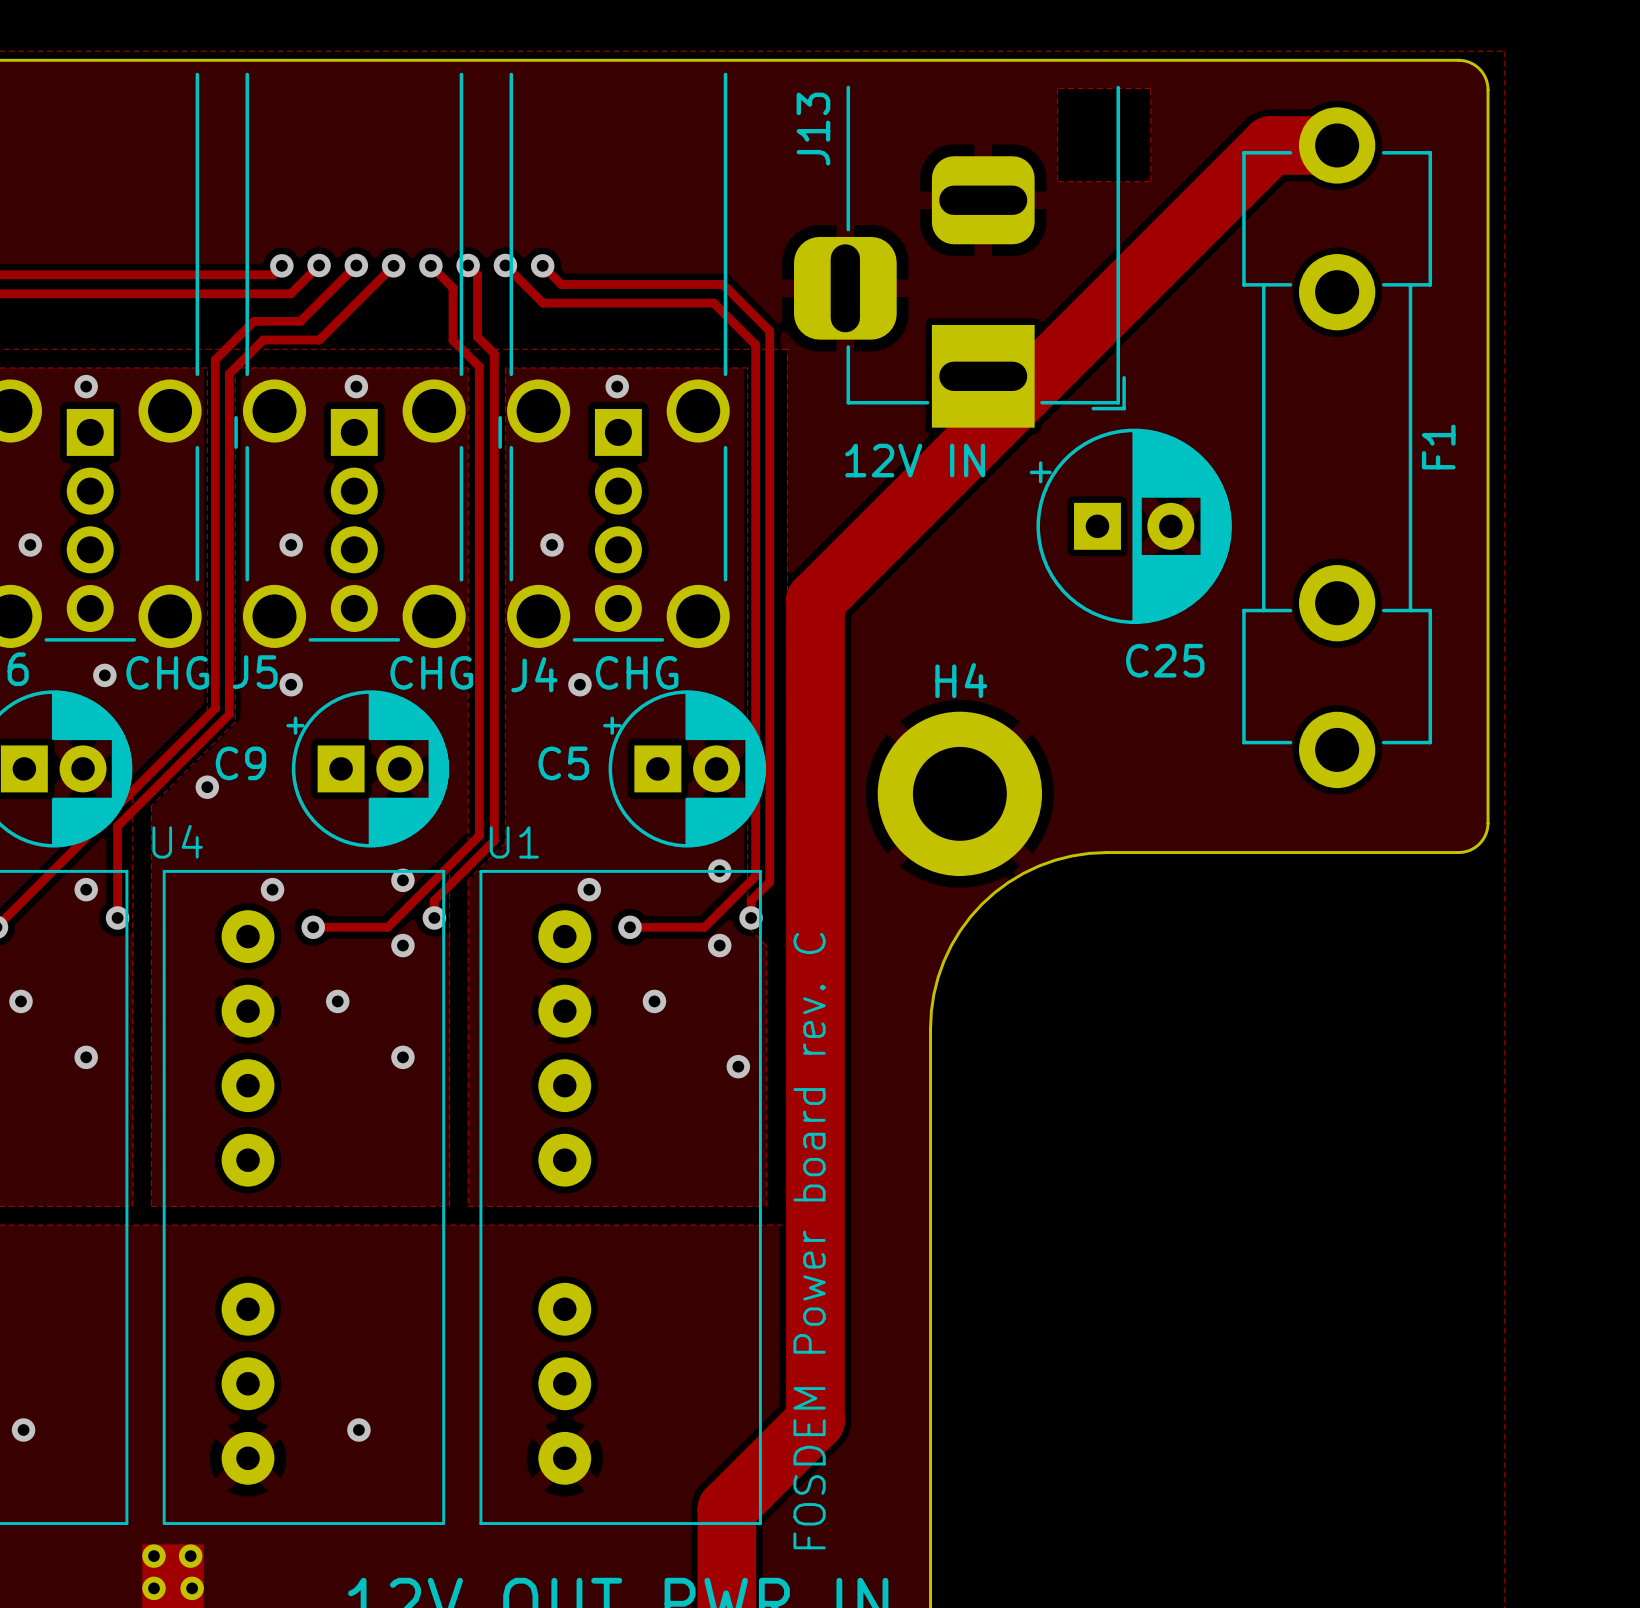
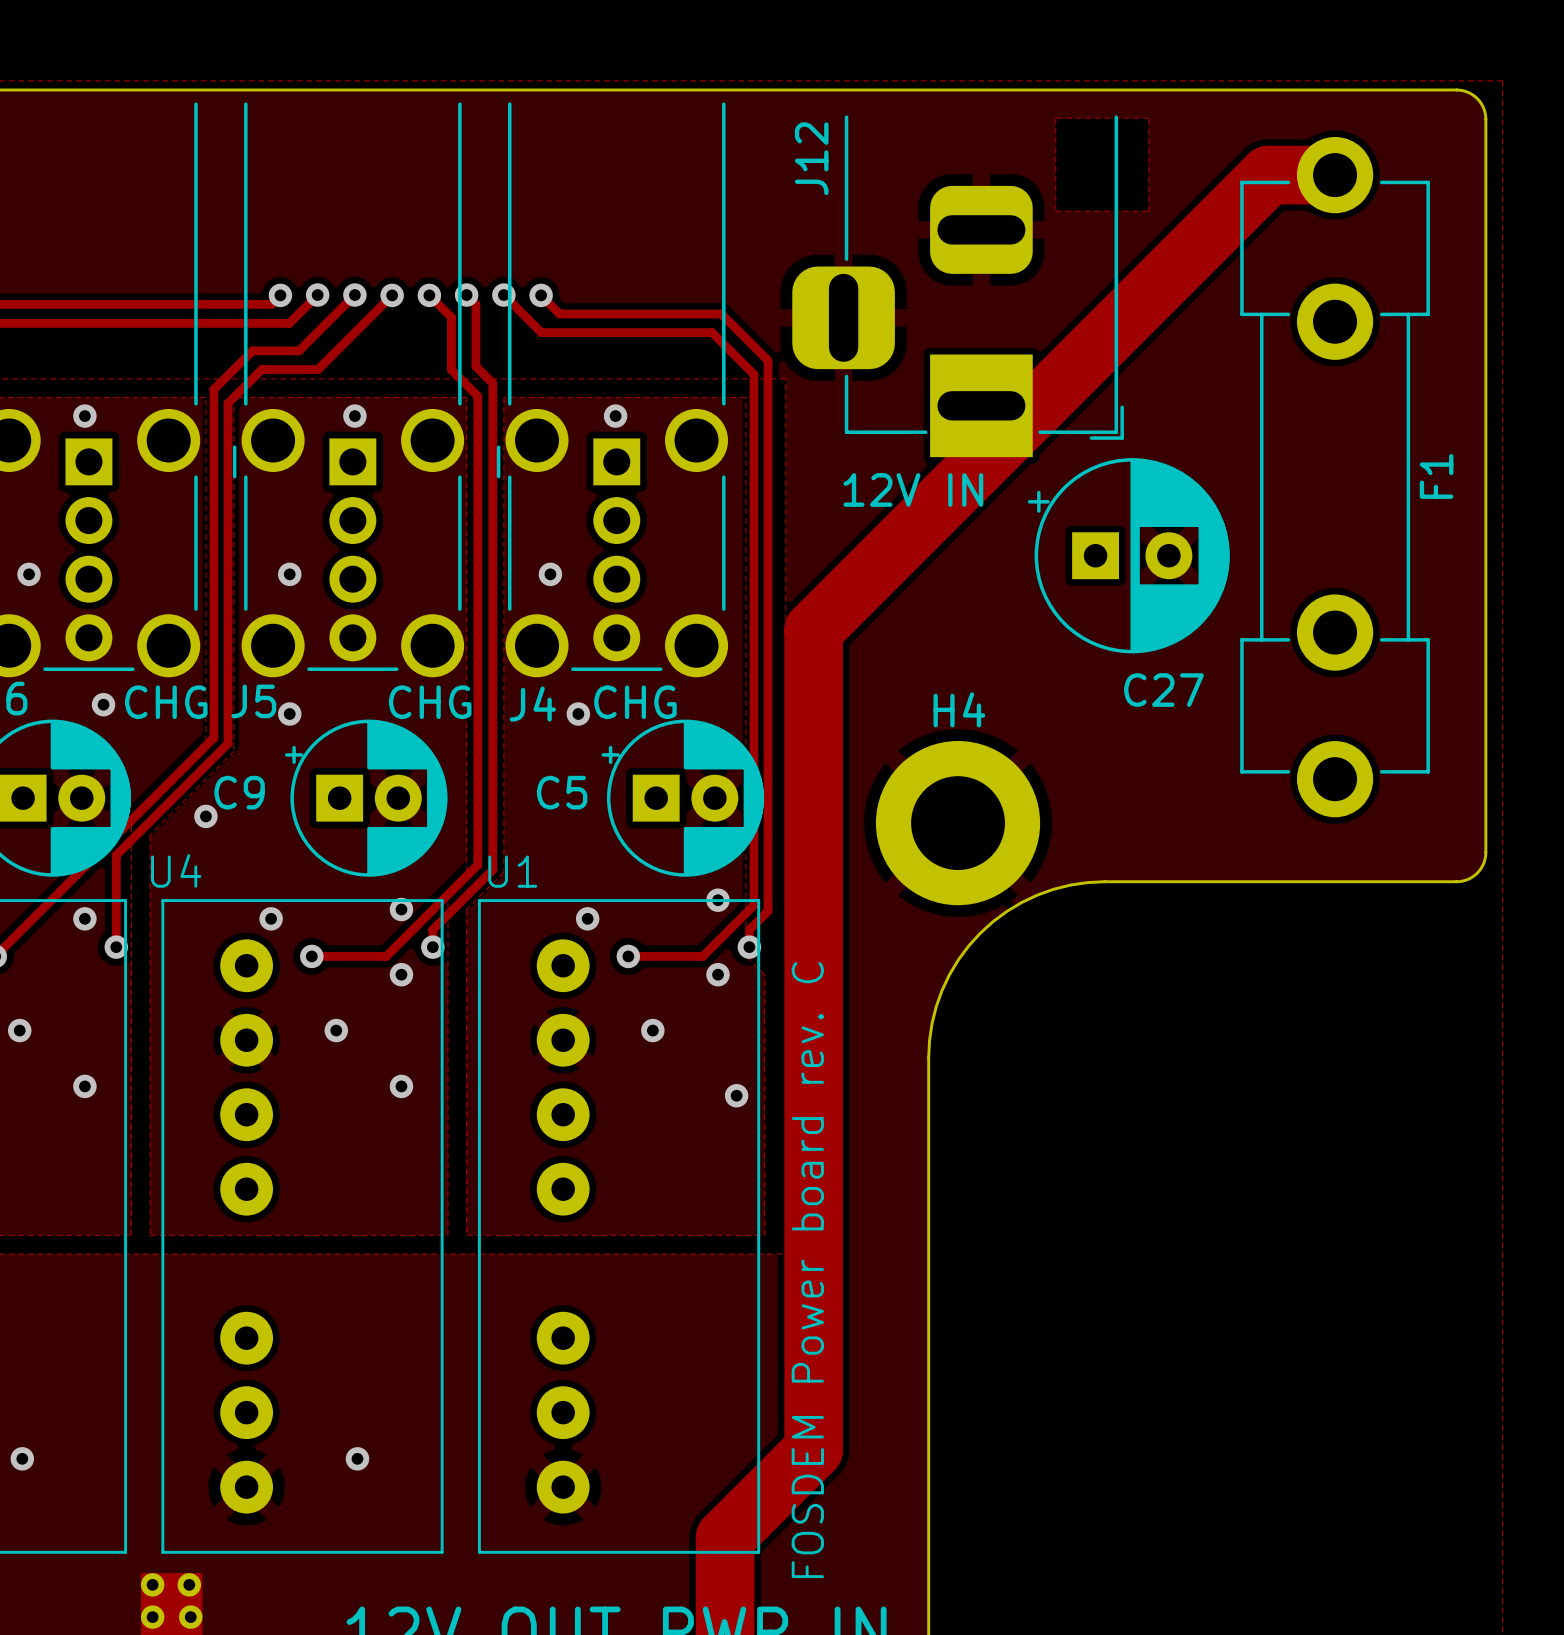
J13 name: J13 (813, 129) -> J12 (811, 158)
C25 name: C25 (1165, 660) -> C27 (1164, 690)

